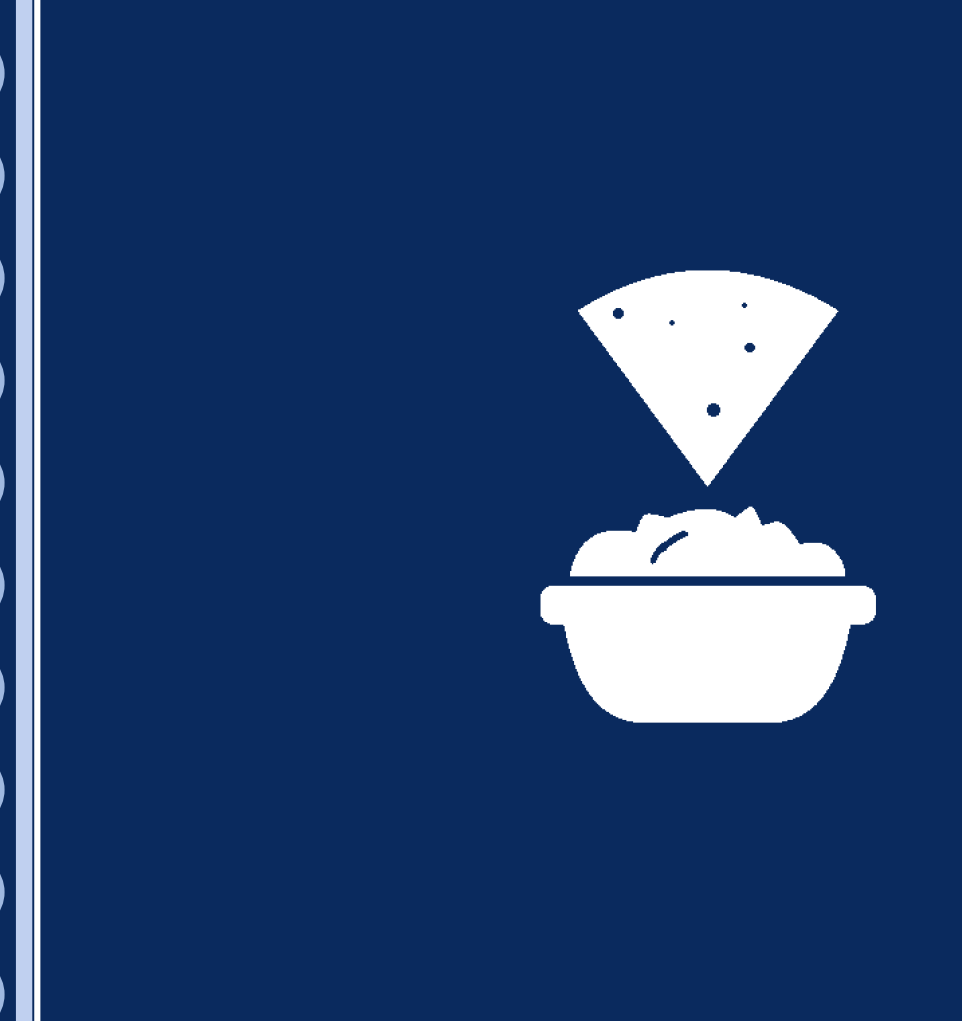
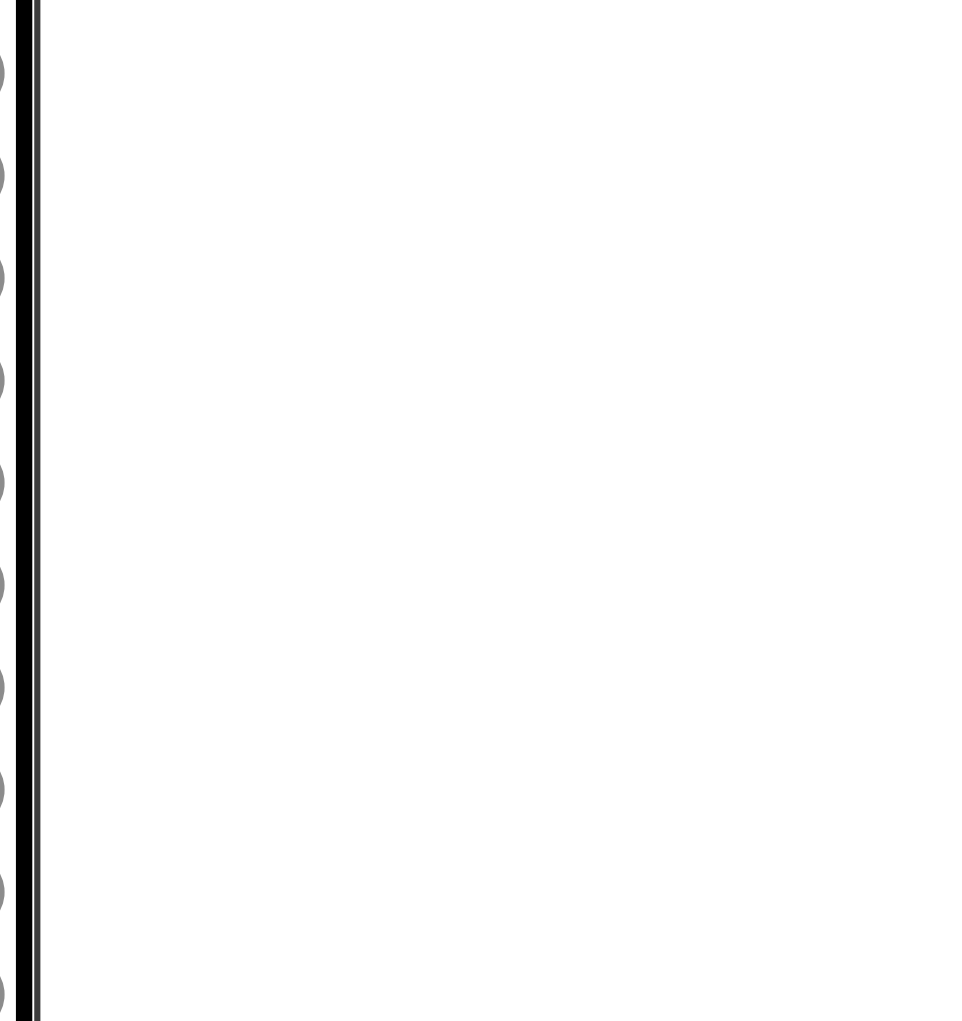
drawing: [540, 270, 876, 723] -> none

